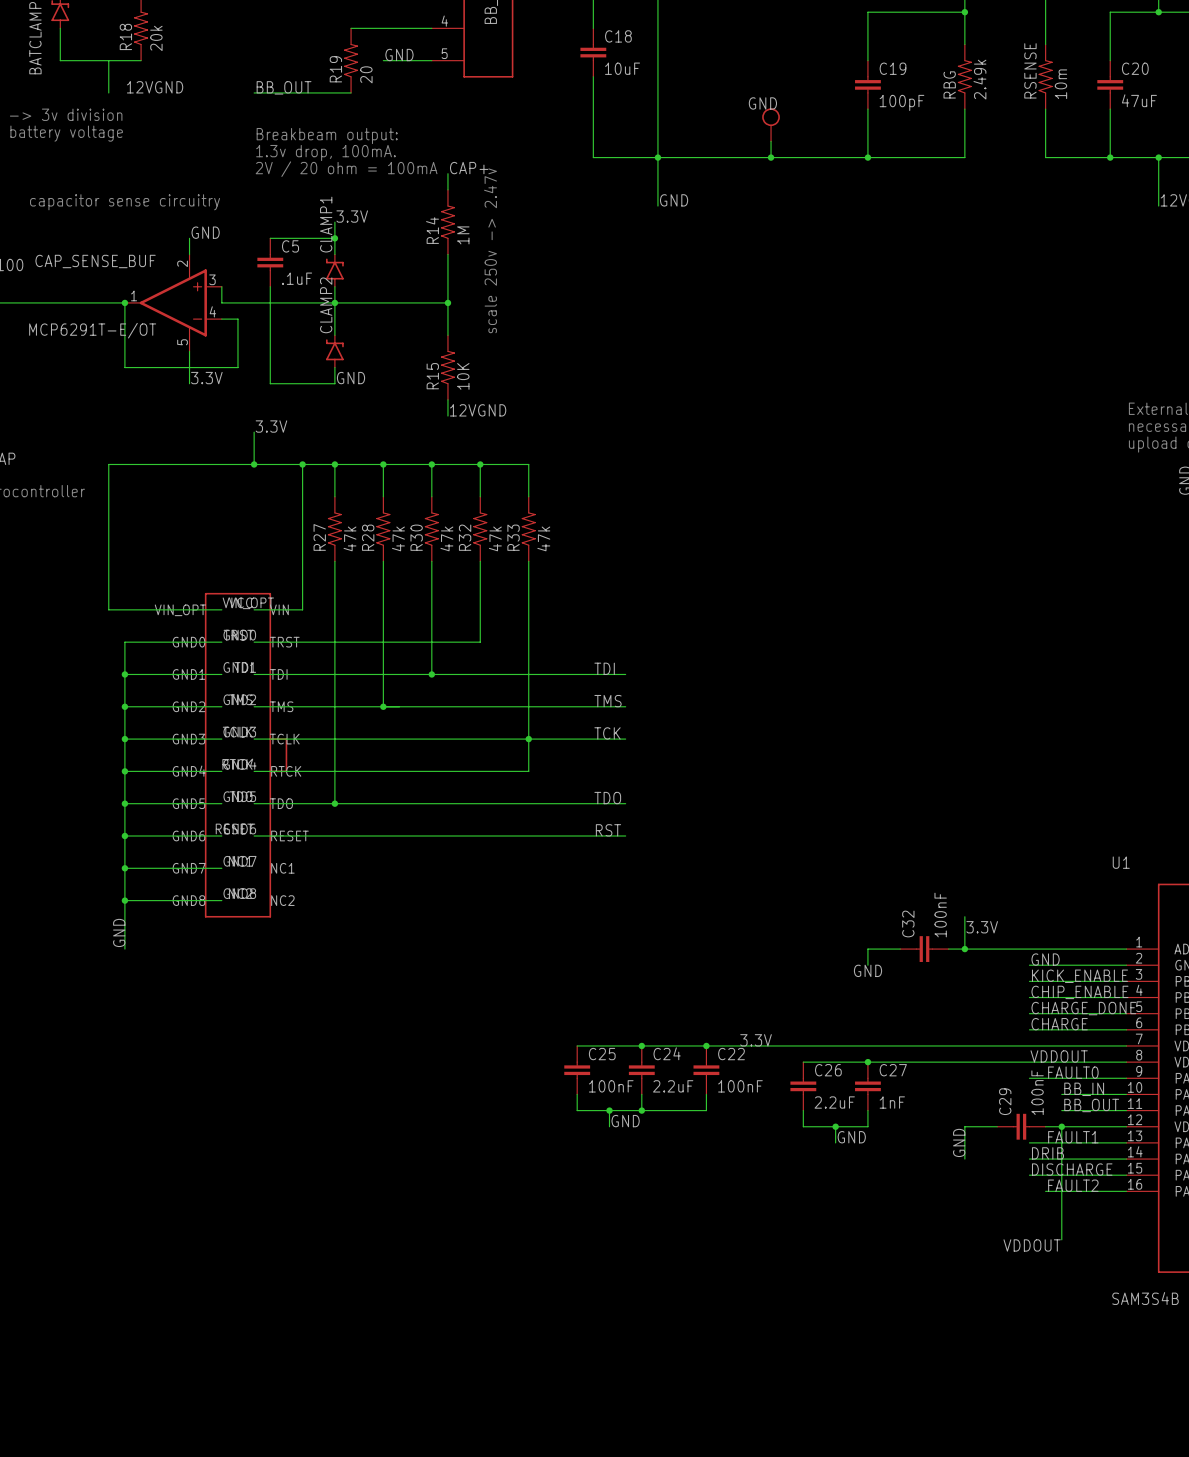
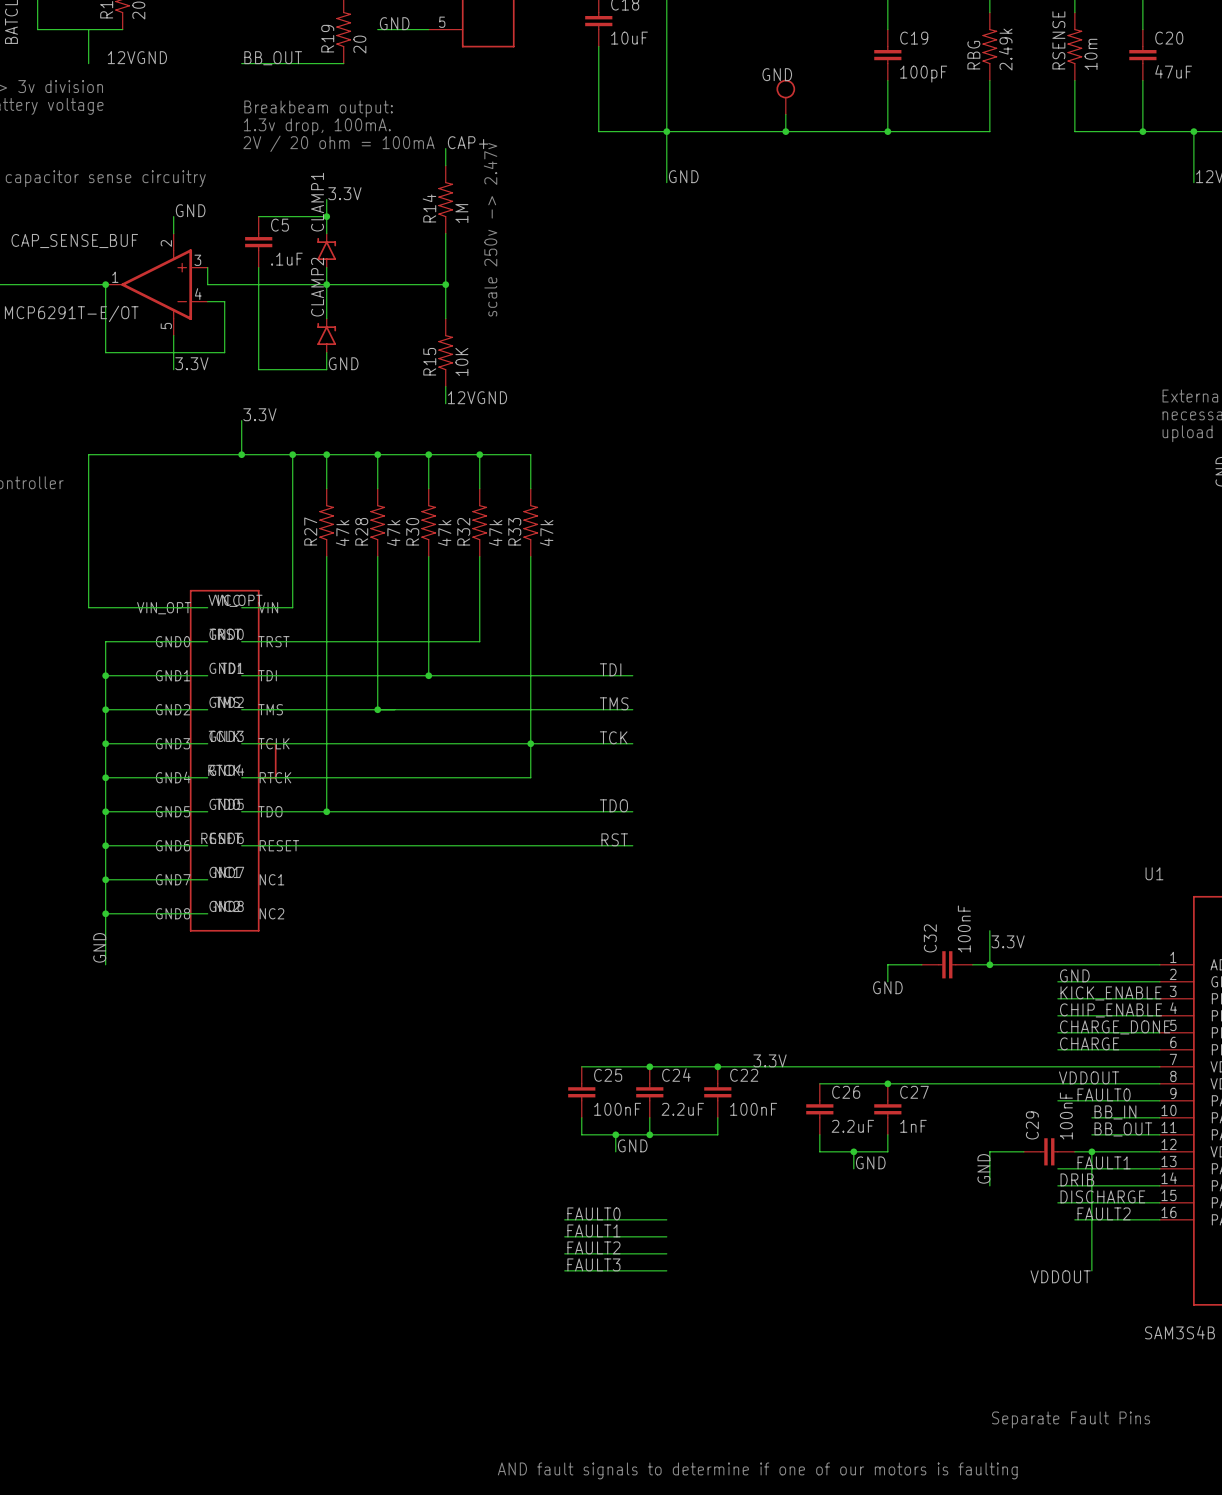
label: none -> FAULT0 (593, 1213)
wire: none -> (564, 1219) (666, 1219)
label: none -> FAULT1 (593, 1230)
wire: none -> (564, 1236) (666, 1236)
label: none -> FAULT2 (593, 1247)
wire: none -> (564, 1253) (666, 1253)
label: none -> FAULT3 (593, 1264)
wire: none -> (564, 1270) (666, 1270)
text: none -> Separate Fault Pins (1071, 1419)
text: none -> AND fault signals to determine if one of our motors is faulting (757, 1470)

